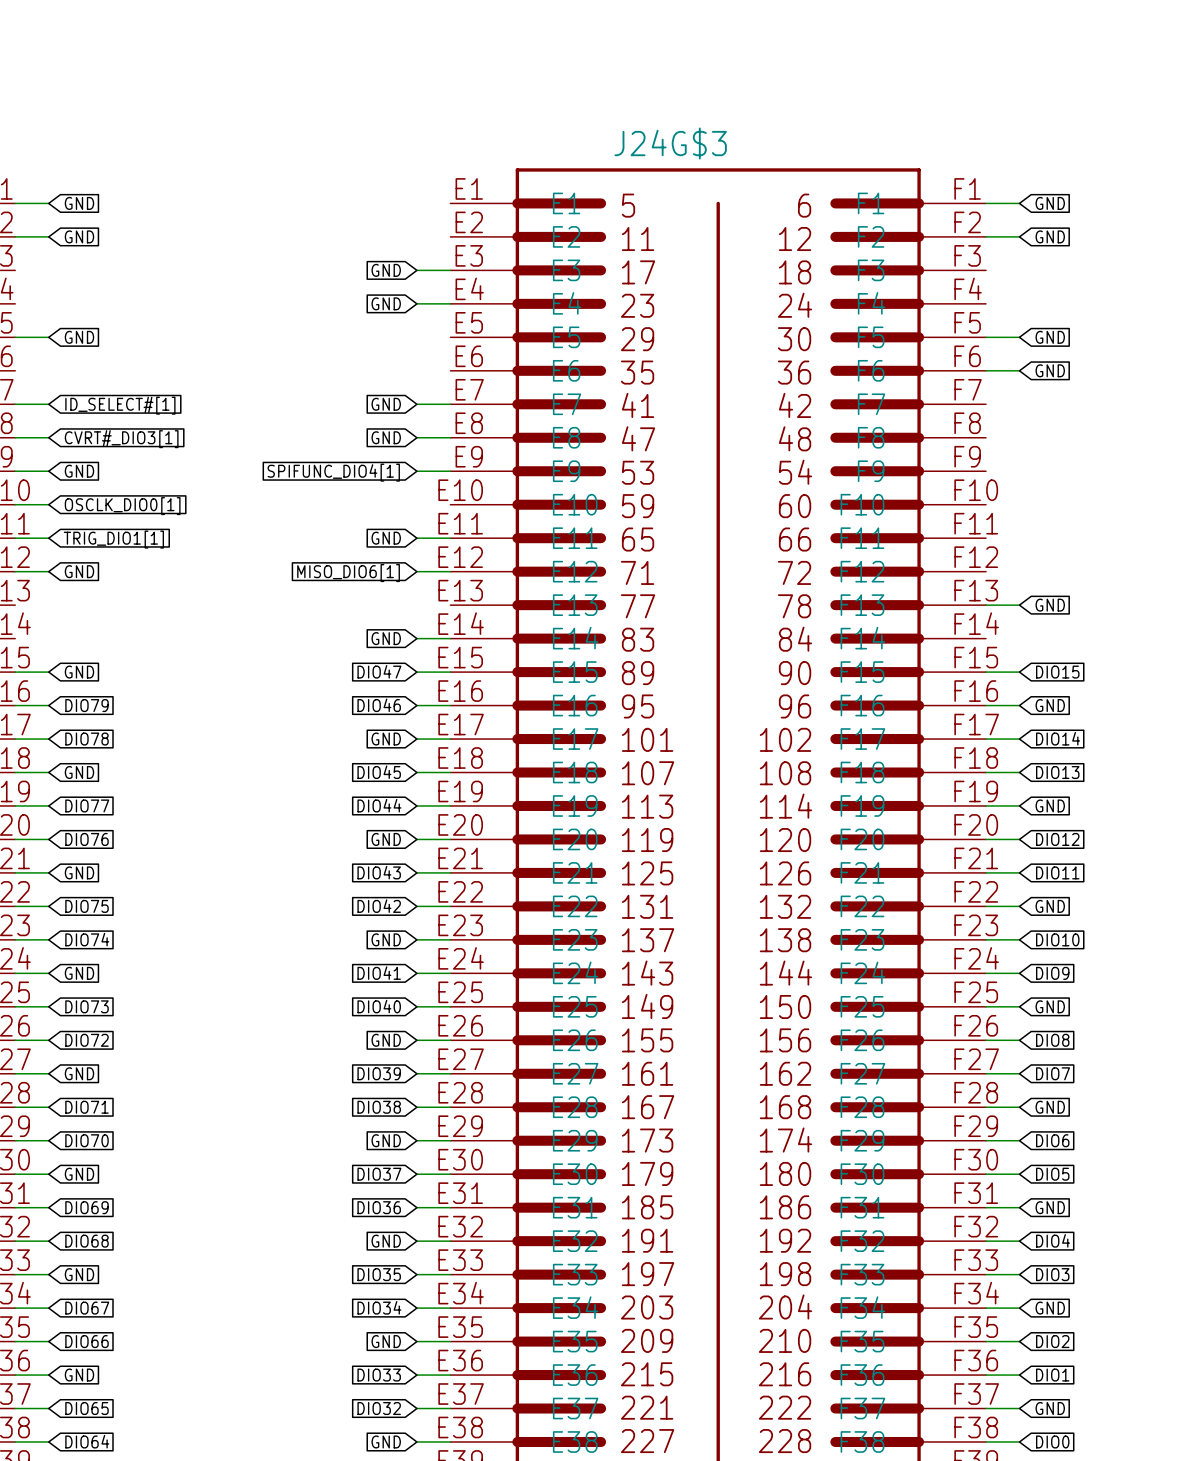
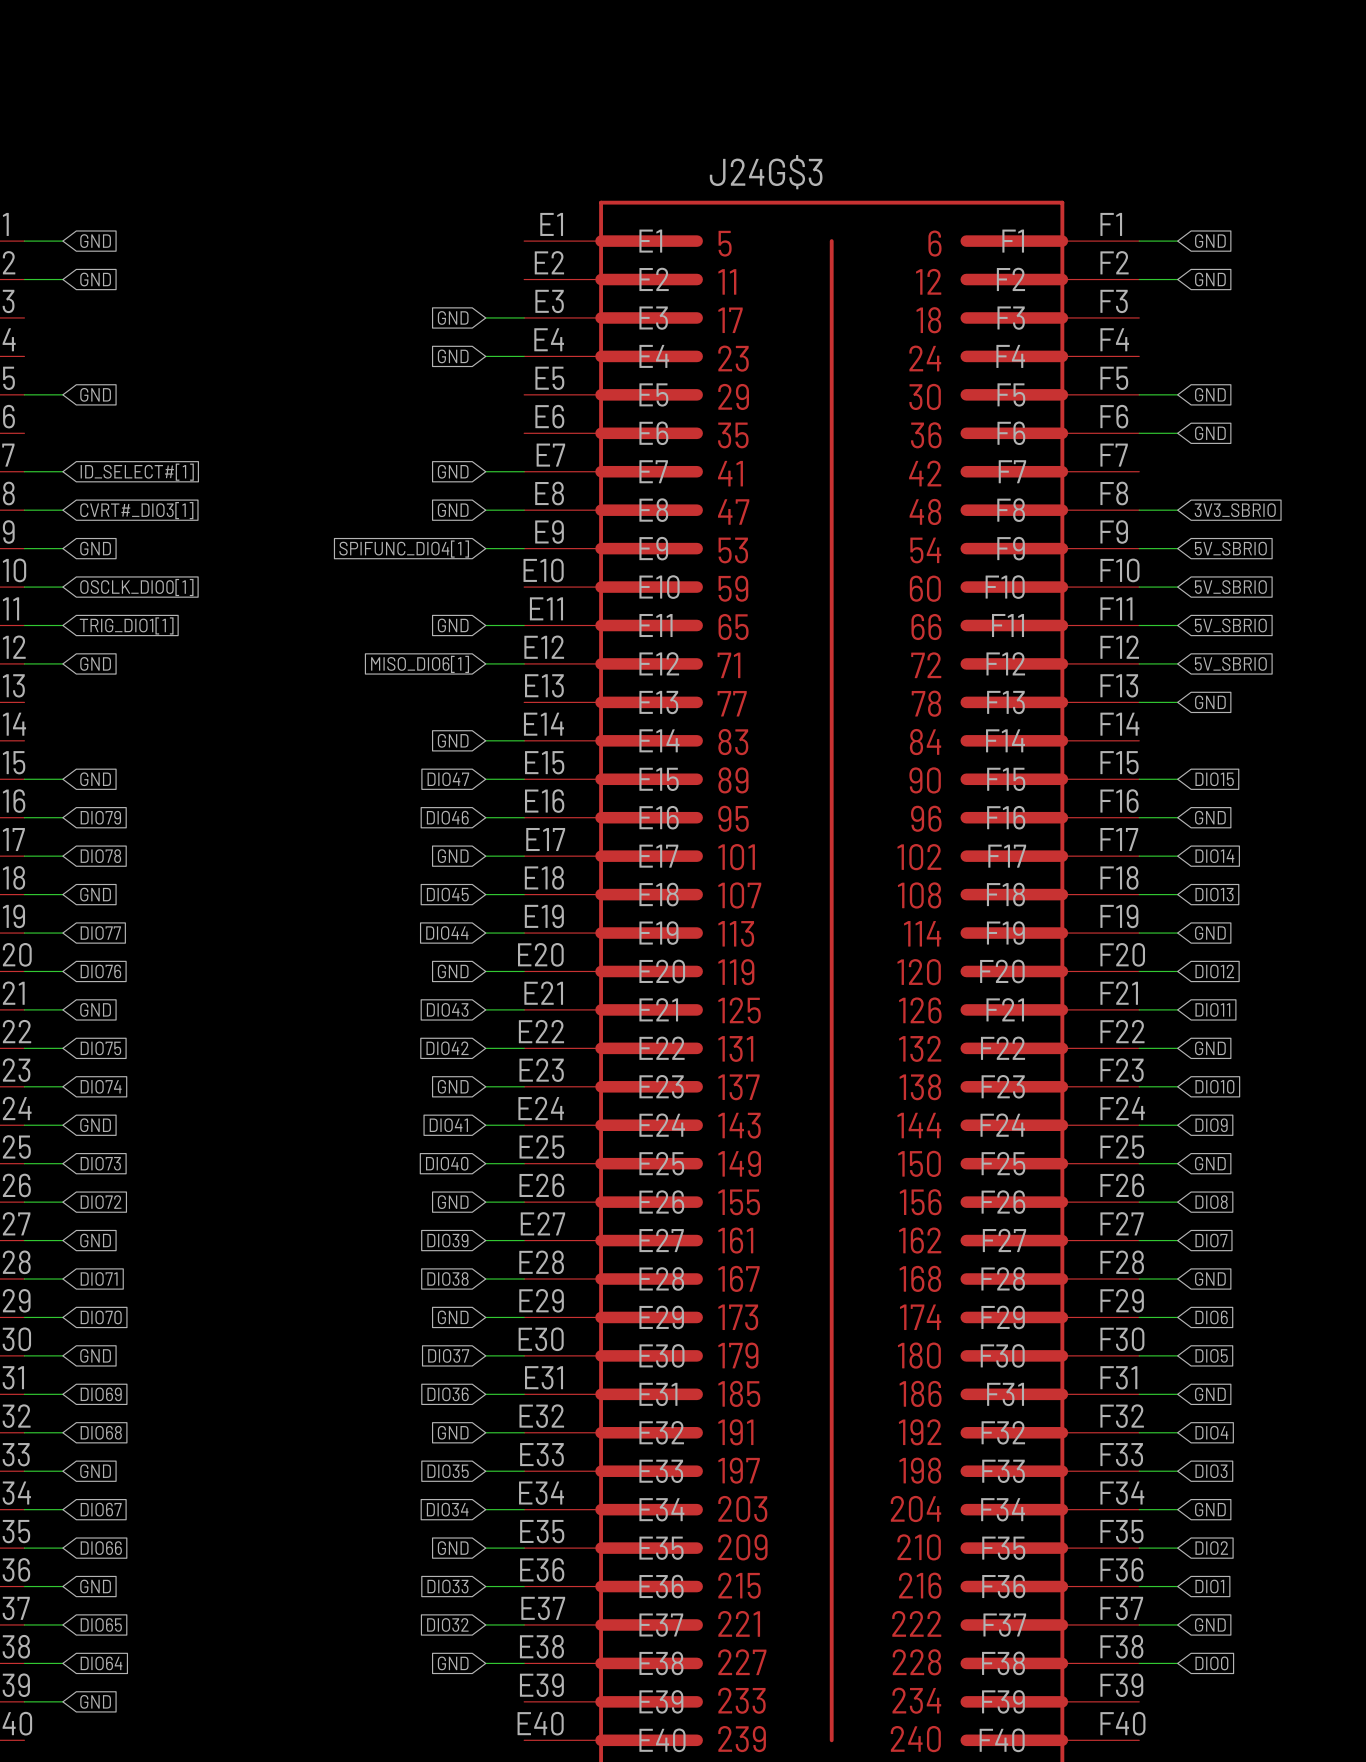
wire: none -> (1139, 510) (1177, 510)
global label: none -> 3V3_SBRIO (1235, 510)
wire: none -> (1139, 548) (1177, 548)
global label: none -> 5V_SBRIO (1230, 548)
wire: none -> (1139, 587) (1177, 587)
global label: none -> 5V_SBRIO (1230, 587)
wire: none -> (1139, 625) (1177, 625)
global label: none -> 5V_SBRIO (1230, 625)
wire: none -> (1139, 663) (1177, 663)
global label: none -> 5V_SBRIO (1230, 663)

